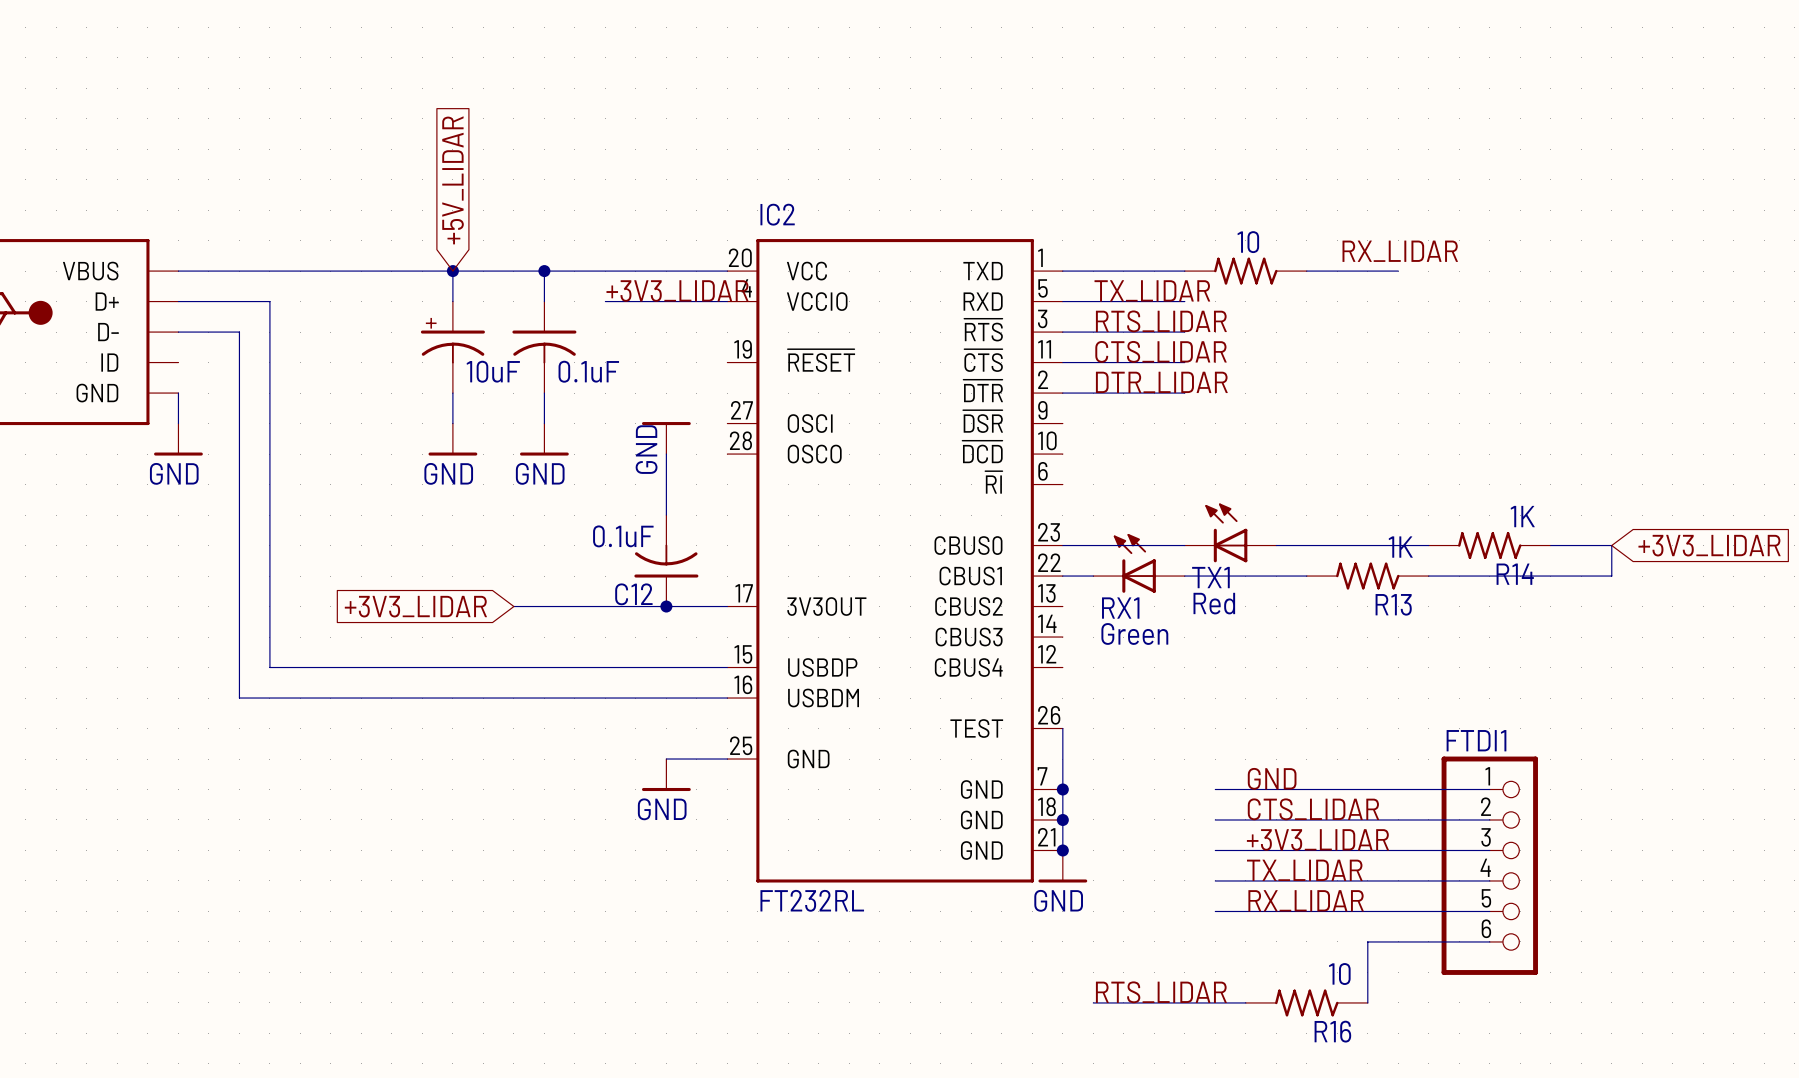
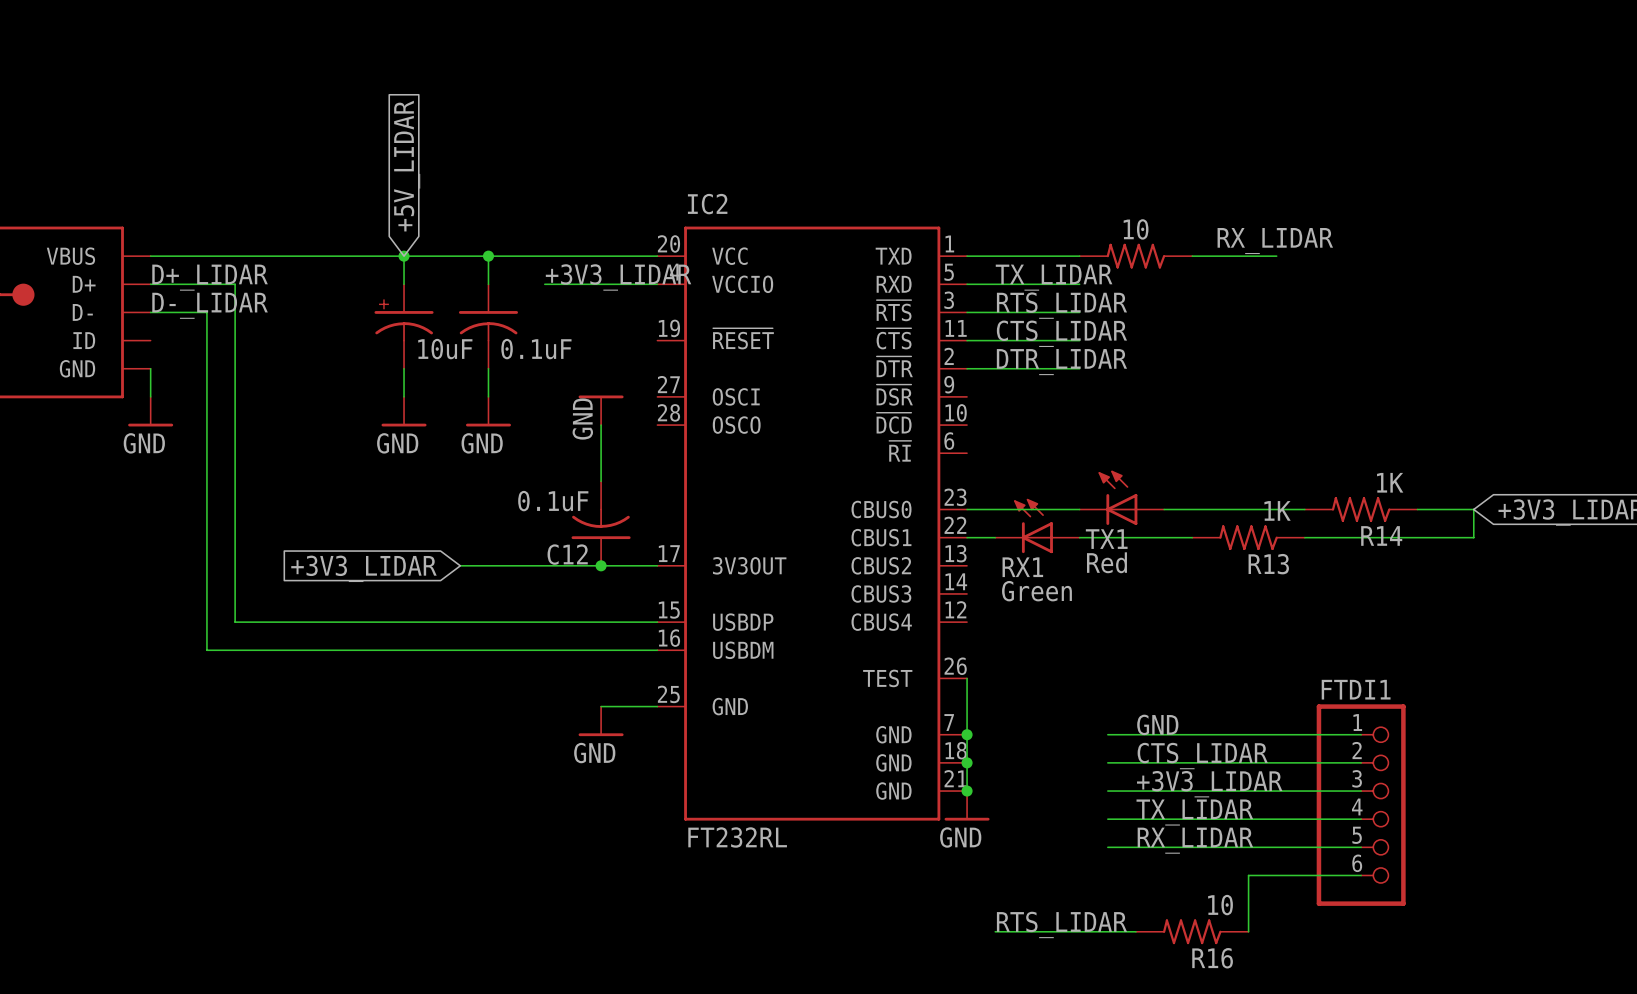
label: none -> D+_LIDAR (210, 277)
label: none -> D-_LIDAR (210, 305)

